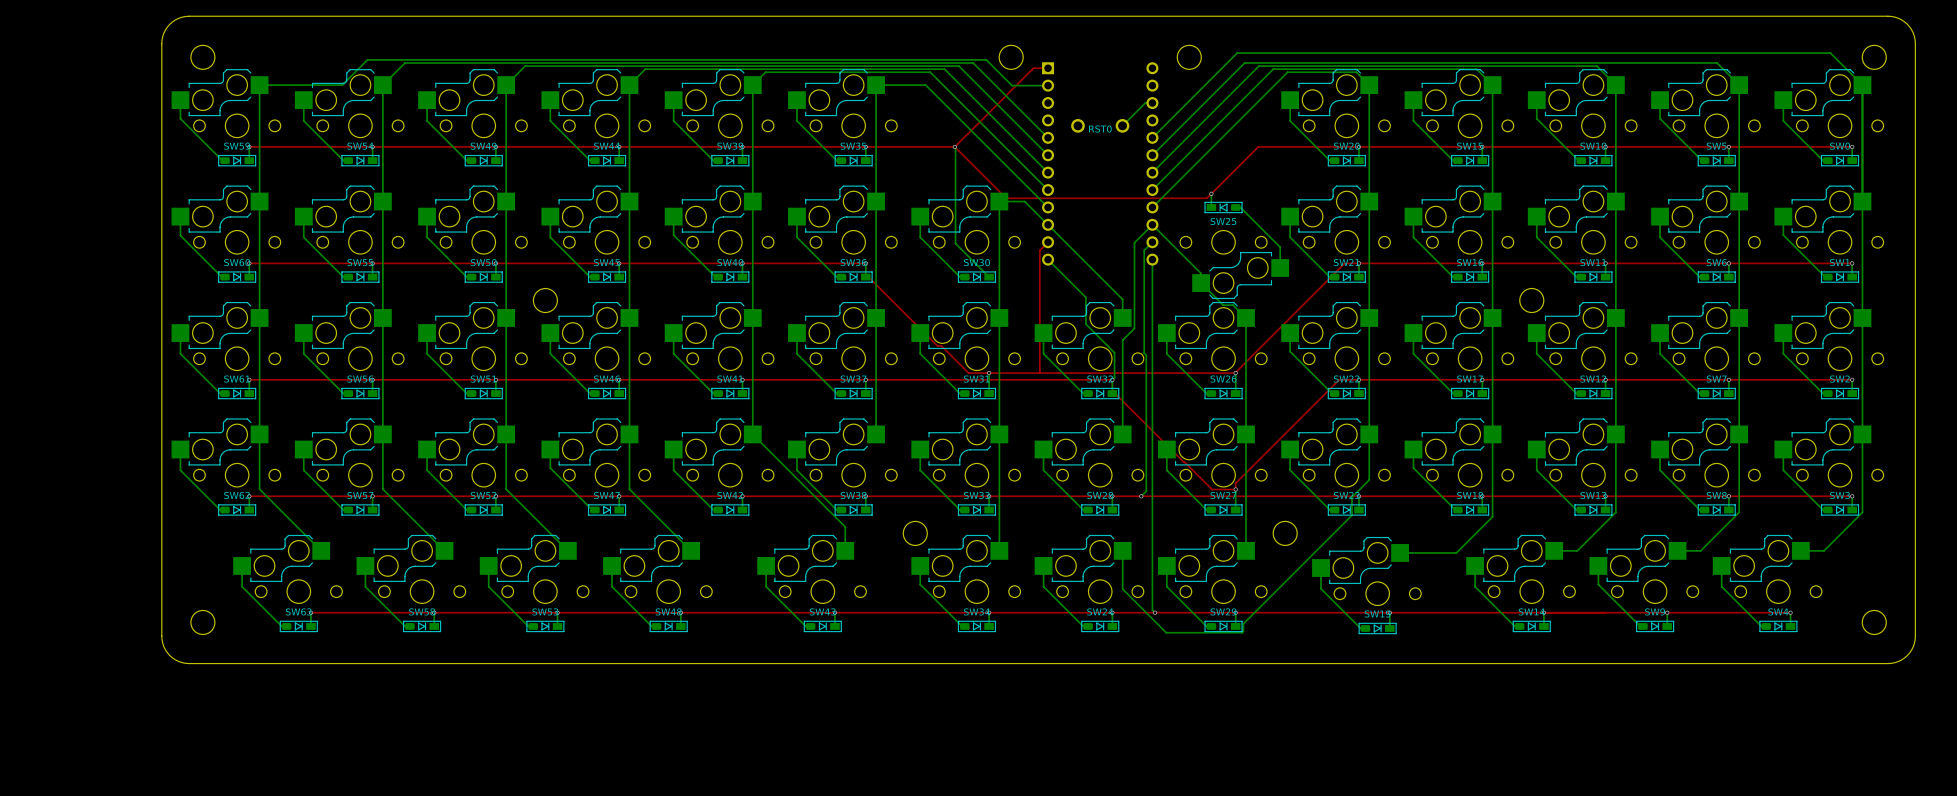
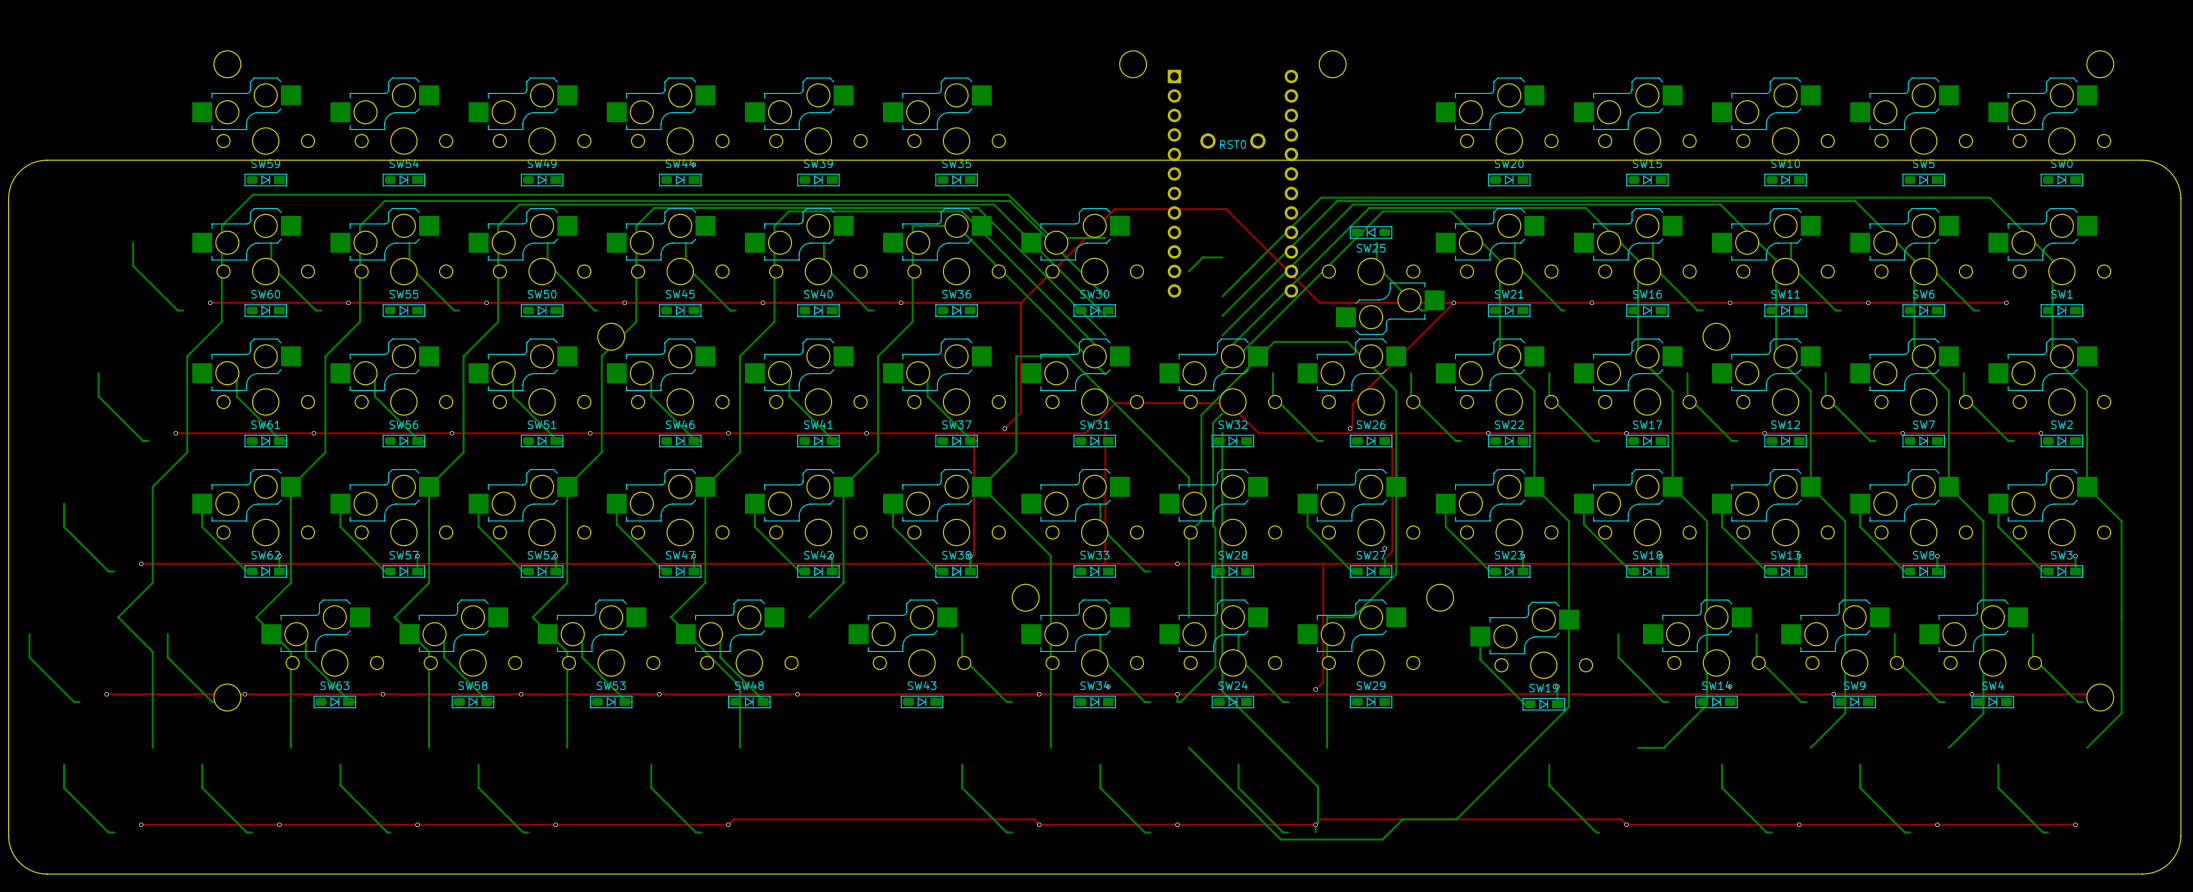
board edge: (1887, 16) (189, 16) (178, 18) (165, 29) (161, 43) (161, 636) (163, 646) (172, 657) (189, 663) (1887, 663) (1898, 661) (1909, 652) (1915, 636) (1915, 43) (1913, 33) (1907, 24) (1898, 18) (1887, 16) -> (2142, 160) (2155, 162) (2169, 171) (2178, 185) (2180, 198) (2180, 835) (2178, 848) (2172, 859) (2155, 871) (2142, 874) (46, 874) (34, 871) (23, 865) (10, 848) (8, 835) (8, 198) (10, 185) (16, 174) (34, 162) (46, 160) (2142, 160)
top track: (1048, 68) (1033, 68) (954, 146) -> none
bottom track: (1048, 85) (1012, 85) (986, 59) (367, 59) (342, 85) (259, 85) (259, 434) -> (1105, 296) (1009, 201) (384, 201) (359, 225) (359, 321) (325, 356) (325, 452) (290, 486)
bottom track: (180, 100) (180, 118) (222, 160) (224, 160) -> none
bottom track: (303, 100) (303, 120) (343, 160) (348, 160) -> (271, 242) (271, 265) (315, 310) (321, 310)
bottom track: (427, 100) (427, 120) (466, 160) (471, 160) -> (409, 242) (409, 265) (453, 310) (459, 310)
bottom track: (550, 100) (550, 120) (590, 160) (594, 160) -> none
bottom track: (673, 100) (673, 120) (713, 160) (718, 160) -> (685, 242) (685, 265) (730, 310) (735, 310)
bottom track: (796, 100) (796, 120) (836, 160) (841, 160) -> (823, 242) (823, 265) (868, 310) (873, 310)
bottom track: (1290, 100) (1290, 120) (1329, 160) (1334, 160) -> (1376, 242) (1376, 265) (1421, 310) (1426, 310)
bottom track: (1413, 100) (1413, 120) (1453, 160) (1457, 160) -> (1652, 242) (1652, 265) (1697, 310) (1702, 310)
bottom track: (1536, 100) (1536, 118) (1578, 160) (1581, 160) -> none
bottom track: (1660, 100) (1660, 118) (1701, 160) (1704, 160) -> none
bottom track: (1783, 100) (1783, 120) (1823, 160) (1827, 160) -> (1929, 242) (1929, 265) (1973, 310) (1979, 310)
bottom track: (1152, 103) (1145, 103) (1122, 125) -> none
bottom track: (1048, 137) (973, 62) (404, 62) (382, 85) (382, 434) -> (1105, 315) (993, 204) (519, 204) (498, 225) (498, 321) (463, 356) (463, 452) (429, 486)
bottom track: (1152, 137) (1237, 53) (1830, 53) (1862, 85) (1862, 512) (1823, 550) (1800, 550) -> none
bottom track: (249, 146) (249, 160) -> none
via: (249, 146) -> none
bottom track: (372, 146) (372, 160) -> none
via: (372, 146) -> none
bottom track: (495, 146) (495, 160) -> none
via: (495, 146) -> none
bottom track: (619, 146) (619, 160) -> none
bottom track: (742, 146) (742, 160) -> none
via: (742, 146) -> none
bottom track: (865, 146) (865, 160) -> none
via: (865, 146) -> none
bottom track: (954, 146) (955, 243) (989, 277) -> none
top track: (954, 146) (249, 146) -> none
via: (954, 146) -> none
bottom track: (1359, 146) (1359, 160) -> none
via: (1359, 146) -> none
bottom track: (1482, 146) (1482, 160) -> none
via: (1482, 146) -> none
bottom track: (1605, 146) (1605, 160) -> none
via: (1605, 146) -> none
bottom track: (1728, 146) (1728, 160) -> none
via: (1728, 146) -> none
bottom track: (1852, 146) (1852, 160) -> none
top track: (1852, 146) (1258, 146) (1206, 198) (1006, 198) (954, 146) -> none
via: (1852, 146) -> none
bottom track: (1048, 155) (958, 66) (525, 66) (506, 85) (506, 434) -> (1105, 335) (977, 207) (654, 207) (636, 225) (636, 321) (601, 356) (601, 452) (567, 486)
bottom track: (1152, 155) (1244, 62) (1717, 62) (1739, 85) (1739, 512) (1700, 550) (1677, 550) -> none
bottom track: (1048, 172) (944, 69) (645, 69) (629, 85) (629, 434) -> (1105, 354) (961, 211) (788, 211) (774, 225) (774, 321) (739, 356) (739, 452) (705, 486)
bottom track: (1152, 172) (1258, 66) (1596, 66) (1615, 85) (1615, 512) (1577, 550) (1554, 550) -> none
bottom track: (1048, 190) (930, 72) (765, 72) (752, 85) (752, 434) (845, 526) (845, 550) -> none
bottom track: (1152, 190) (1273, 69) (1476, 69) (1492, 85) (1492, 348) -> (1222, 354) (1369, 207) (1585, 207) (1637, 260) (1637, 356) (1672, 390)
bottom track: (1211, 193) (1211, 207) -> none
via: (1211, 193) -> none
bottom track: (1048, 207) (925, 85) (876, 85) (876, 434) -> none
bottom track: (1152, 207) (1287, 72) (1356, 72) (1369, 85) (1369, 348) -> (1222, 374) (1222, 372) (1382, 211) (1450, 211) (1499, 260) (1499, 356) (1534, 390)
bottom track: (1235, 207) (1240, 207) (1280, 247) (1280, 267) -> none
bottom track: none -> (1105, 237) (1051, 237) (1008, 194) (252, 194) (221, 225) (221, 321) (187, 356) (187, 452) (152, 486) (152, 582) (118, 617) (152, 651) (152, 747)
bottom track: none -> (133, 242) (133, 265) (177, 310) (183, 310)
bottom track: (180, 216) (180, 235) (221, 277) (224, 277) -> none
bottom track: (303, 216) (303, 237) (343, 277) (348, 277) -> none
bottom track: (427, 216) (427, 237) (466, 277) (471, 277) -> none
bottom track: none -> (547, 242) (547, 263) (594, 310) (597, 310)
bottom track: (550, 216) (550, 237) (590, 277) (594, 277) -> none
bottom track: (673, 216) (673, 235) (715, 277) (718, 277) -> none
bottom track: (796, 216) (796, 237) (836, 277) (841, 277) -> none
bottom track: (920, 216) (920, 237) (959, 277) (964, 277) -> none
bottom track: (1290, 216) (1290, 237) (1329, 277) (1334, 277) -> (1549, 373) (1549, 396) (1593, 440) (1599, 440)
bottom track: (1413, 216) (1413, 237) (1453, 277) (1457, 277) -> none
bottom track: (1536, 216) (1536, 237) (1576, 277) (1581, 277) -> none
bottom track: (1660, 216) (1660, 237) (1699, 277) (1704, 277) -> (1791, 242) (1791, 265) (1835, 310) (1841, 310)
bottom track: (1783, 216) (1783, 235) (1825, 277) (1827, 277) -> none
bottom track: none -> (1222, 257) (1202, 257) (1188, 271)
top track: (1048, 242) (1039, 250) (1038, 373) -> none
bottom track: (1152, 242) (1144, 250) (1146, 491) (1141, 496) -> none
bottom track: (1048, 259) (1085, 297) (1085, 324) (1114, 352) (1112, 393) -> none
bottom track: (1152, 259) (1152, 610) (1155, 612) -> none
bottom track: (249, 263) (249, 277) -> none
top track: (249, 263) (865, 263) (865, 274) (937, 345) (941, 345) (968, 373) (989, 373) -> none
via: (249, 263) -> none
bottom track: (372, 263) (372, 277) -> none
via: (372, 263) -> none
bottom track: (495, 263) (495, 277) -> none
via: (495, 263) -> none
bottom track: (619, 263) (619, 277) -> none
via: (619, 263) -> none
bottom track: (742, 263) (742, 277) -> none
via: (742, 263) -> none
bottom track: (865, 263) (865, 277) -> none
via: (865, 263) -> none
bottom track: (1359, 263) (1359, 277) -> none
via: (1359, 263) -> none
bottom track: (1482, 263) (1482, 277) -> none
via: (1482, 263) -> none
bottom track: (1605, 263) (1605, 277) -> none
via: (1605, 263) -> none
bottom track: (1728, 263) (1728, 277) -> none
via: (1728, 263) -> none
bottom track: (1852, 263) (1852, 277) -> none
top track: (1852, 263) (1344, 263) (1235, 372) -> none
via: (1852, 263) -> none
bottom track: none -> (1222, 296) (1321, 197) (1989, 197) (2052, 260) (2052, 356) (2087, 390) (2087, 486) (2121, 521) (2121, 713) (2087, 747)
via: none -> (210, 302)
via: none -> (348, 302)
via: none -> (486, 302)
via: none -> (624, 302)
via: none -> (762, 302)
via: none -> (901, 302)
top track: none -> (1020, 302) (210, 302)
top track: none -> (1020, 302) (1020, 412) (1004, 428)
top track: none -> (1453, 302) (1352, 404) (1352, 426) (1350, 428)
via: none -> (1453, 302)
via: none -> (1591, 302)
via: none -> (1730, 302)
via: none -> (1868, 302)
top track: none -> (2006, 302) (1319, 302) (1226, 209) (1114, 209) (1020, 302)
via: none -> (2006, 302)
bottom track: none -> (1222, 315) (1337, 201) (1855, 201) (1914, 260) (1914, 356) (1948, 390) (1948, 486) (1983, 521) (1983, 713) (1948, 747)
bottom track: none -> (1222, 335) (1353, 204) (1720, 204) (1776, 260) (1776, 356) (1810, 390) (1810, 486) (1845, 521) (1845, 713) (1810, 747)
bottom track: (1122, 317) (1122, 299) (1024, 201) (999, 201) (999, 550) -> none
bottom track: (180, 333) (180, 353) (220, 393) (224, 393) -> (98, 373) (98, 396) (143, 440) (148, 440)
bottom track: (303, 333) (303, 353) (343, 393) (348, 393) -> (236, 373) (236, 396) (281, 440) (286, 440)
bottom track: (427, 333) (427, 353) (466, 393) (471, 393) -> (374, 373) (374, 396) (419, 440) (424, 440)
bottom track: (550, 333) (550, 353) (590, 393) (594, 393) -> (513, 373) (513, 396) (557, 440) (562, 440)
bottom track: (673, 333) (673, 353) (713, 393) (718, 393) -> (651, 373) (651, 396) (695, 440) (701, 440)
bottom track: (796, 333) (796, 353) (836, 393) (841, 393) -> (789, 373) (789, 396) (833, 440) (839, 440)
bottom track: (920, 333) (920, 353) (959, 393) (964, 393) -> (927, 373) (927, 396) (972, 440) (977, 440)
bottom track: (1043, 333) (1043, 353) (1083, 393) (1088, 393) -> (1100, 503) (1100, 526) (1144, 571) (1150, 571)
bottom track: none -> (1273, 373) (1273, 396) (1317, 440) (1322, 440)
bottom track: (1166, 333) (1166, 353) (1206, 393) (1211, 393) -> (1411, 373) (1411, 396) (1455, 440) (1461, 440)
bottom track: (1290, 333) (1290, 351) (1332, 393) (1334, 393) -> (1514, 242) (1514, 263) (1561, 310) (1564, 310)
bottom track: (1413, 333) (1413, 353) (1453, 393) (1457, 393) -> (1687, 373) (1687, 396) (1732, 440) (1737, 440)
bottom track: (1536, 333) (1536, 353) (1576, 393) (1581, 393) -> (1825, 373) (1825, 396) (1870, 440) (1875, 440)
bottom track: (1660, 333) (1660, 353) (1699, 393) (1704, 393) -> (1963, 373) (1963, 396) (2008, 440) (2013, 440)
bottom track: (1783, 333) (1783, 353) (1823, 393) (1827, 393) -> none
bottom track: none -> (1105, 374) (956, 225) (912, 225) (912, 321) (878, 356) (878, 452) (843, 486) (843, 582) (809, 617)
bottom track: (1245, 348) (1245, 317) (1233, 305) (1223, 305) (1201, 283) (1201, 273) (1152, 224) (1134, 242) (1134, 328) (1122, 340) (1122, 434) -> (1396, 390) (1347, 341) (1274, 341) (1201, 414) (1201, 520) (1188, 533) (1188, 617)
bottom track: none -> (1222, 413) (1213, 422) (1215, 667) (1180, 701) (1177, 701) (1177, 694)
bottom track: (989, 372) (989, 393) -> none
via: (989, 372) -> none
bottom track: (1235, 372) (1235, 393) -> none
via position: (1235, 372) -> (1350, 428)
top track: (1235, 373) (989, 373) -> none
bottom track: (249, 379) (249, 393) -> none
top track: (249, 379) (1112, 379) (1112, 390) (1212, 489) (1235, 489) -> none
via position: (249, 379) -> (313, 433)
bottom track: (372, 379) (372, 393) -> none
via position: (372, 379) -> (452, 433)
bottom track: (495, 379) (495, 393) -> none
via position: (495, 379) -> (590, 433)
bottom track: (619, 379) (619, 393) -> none
via position: (619, 379) -> (728, 433)
bottom track: (742, 379) (742, 393) -> none
via position: (742, 379) -> (866, 433)
bottom track: (865, 379) (865, 393) -> none
via position: (865, 379) -> (1004, 428)
via: (1112, 379) -> none
bottom track: (1359, 379) (1359, 393) -> none
via position: (1359, 379) -> (1488, 433)
bottom track: (1482, 379) (1482, 393) -> none
via position: (1482, 379) -> (1626, 433)
bottom track: (1605, 379) (1605, 393) -> none
via position: (1605, 379) -> (1764, 433)
bottom track: (1728, 379) (1728, 393) -> none
via position: (1728, 379) -> (1902, 433)
bottom track: (1852, 379) (1852, 393) -> none
top track: (1852, 379) (1339, 379) (1235, 483) (1235, 489) -> none
via position: (1852, 379) -> (2040, 433)
via: none -> (175, 433)
top track: none -> (974, 433) (974, 555) (970, 559)
top track: none -> (1105, 432) (1104, 563)
bottom track: none -> (1222, 432) (1222, 691) (1318, 786) (1318, 822) (1315, 824) (1315, 832)
top track: none -> (1392, 433) (1392, 551) (1384, 559)
top track: none -> (2040, 433) (1258, 433) (1228, 403) (1115, 403) (1085, 433) (175, 433)
bottom track: none -> (1188, 486) (1188, 477) (1067, 356) (1016, 356) (1016, 452) (981, 486) (1050, 555) (1050, 747)
bottom track: (1369, 434) (1369, 479) (1351, 497) (1351, 515) (1243, 623) (1242, 632) (1166, 632) (1122, 589) (1122, 550) -> (1534, 486) (1568, 521) (1568, 706) (1456, 819) (1402, 819) (1382, 839) (1280, 839) (1188, 747)
bottom track: (1492, 434) (1492, 516) (1456, 552) (1400, 552) -> (1672, 486) (1707, 521) (1707, 704) (1663, 747) (1637, 747)
bottom track: none -> (64, 503) (64, 526) (108, 571) (113, 571)
bottom track: (920, 449) (920, 470) (959, 509) (964, 509) -> (962, 634) (962, 657) (1006, 701) (1012, 701)
bottom track: (1043, 449) (1043, 470) (1083, 509) (1088, 509) -> (1100, 634) (1100, 657) (1144, 701) (1150, 701)
bottom track: (259, 489) (321, 550) -> (290, 548) (290, 582) (256, 617) (290, 651) (290, 747)
bottom track: (382, 489) (444, 550) -> (429, 548) (429, 582) (394, 617) (429, 651) (429, 747)
bottom track: (506, 489) (567, 550) -> (567, 548) (567, 582) (532, 617) (567, 651) (567, 747)
bottom track: (629, 489) (691, 550) -> (705, 548) (705, 582) (670, 617) (739, 686) (739, 747)
bottom track: (1235, 489) (1235, 498) -> none
bottom track: (989, 496) (989, 509) -> none
via: (989, 496) -> none
bottom track: (1112, 496) (1112, 509) -> none
via: (1112, 496) -> none
via: (1141, 496) -> none
top track: (1852, 496) (249, 496) -> none
via: none -> (141, 563)
via: none -> (1177, 563)
top track: none -> (1323, 563) (1323, 681) (1315, 689)
top track: none -> (2075, 563) (141, 563)
bottom track: (1245, 512) (1245, 550) -> (1396, 574) (1353, 617) (1327, 617) (1327, 747)
bottom track: none -> (29, 634) (29, 657) (74, 701) (79, 701)
bottom track: none -> (167, 634) (167, 657) (212, 701) (217, 701)
bottom track: (242, 565) (242, 586) (281, 626) (286, 626) -> (202, 764) (202, 787) (246, 832) (252, 832)
bottom track: (365, 565) (365, 586) (405, 626) (409, 626) -> (305, 634) (305, 657) (350, 701) (355, 701)
bottom track: none -> (444, 634) (444, 657) (488, 701) (493, 701)
bottom track: (488, 565) (488, 586) (528, 626) (533, 626) -> (478, 764) (478, 787) (523, 832) (528, 832)
bottom track: (612, 565) (612, 586) (651, 626) (656, 626) -> (582, 634) (582, 657) (626, 701) (632, 701)
bottom track: none -> (720, 634) (720, 657) (764, 701) (770, 701)
bottom track: (766, 565) (766, 586) (805, 626) (810, 626) -> (962, 764) (962, 787) (1006, 832) (1012, 832)
bottom track: (920, 565) (920, 584) (962, 626) (964, 626) -> none
bottom track: (1043, 565) (1043, 586) (1083, 626) (1088, 626) -> (1100, 764) (1100, 787) (1144, 832) (1150, 832)
bottom track: none -> (1238, 634) (1238, 657) (1282, 701) (1288, 701)
bottom track: (1166, 565) (1166, 586) (1206, 626) (1211, 626) -> (1238, 764) (1238, 787) (1282, 832) (1288, 832)
bottom track: none -> (1618, 634) (1618, 657) (1662, 701) (1668, 701)
bottom track: (1475, 565) (1475, 586) (1514, 626) (1519, 626) -> (1722, 764) (1722, 787) (1766, 832) (1771, 832)
bottom track: none -> (1756, 634) (1756, 657) (1801, 701) (1806, 701)
bottom track: (1598, 565) (1598, 584) (1640, 626) (1642, 626) -> none
bottom track: none -> (1894, 634) (1894, 657) (1939, 701) (1944, 701)
bottom track: (1721, 565) (1721, 586) (1761, 626) (1766, 626) -> (1860, 764) (1860, 787) (1904, 832) (1910, 832)
bottom track: none -> (2032, 634) (2032, 657) (2077, 701) (2082, 701)
bottom track: (310, 612) (310, 626) -> none
via position: (310, 612) -> (382, 694)
bottom track: (434, 612) (434, 626) -> none
via position: (434, 612) -> (521, 694)
bottom track: (557, 612) (557, 626) -> none
via position: (557, 612) -> (659, 694)
bottom track: (680, 612) (680, 626) -> none
via position: (680, 612) -> (797, 694)
bottom track: (834, 612) (834, 626) -> none
via: (834, 612) -> none
bottom track: (989, 612) (989, 626) -> none
bottom track: (1112, 612) (1112, 626) -> none
via: (1112, 612) -> none
via position: (1155, 612) -> (1315, 689)
bottom track: (1235, 612) (1235, 626) -> none
via: (1235, 612) -> none
bottom track: (1543, 612) (1543, 626) -> none
bottom track: (1667, 612) (1667, 626) -> none
via position: (1667, 612) -> (1833, 694)
bottom track: (1790, 612) (1790, 626) -> none
top track: (1790, 612) (310, 612) -> none
via position: (1790, 612) -> (1971, 694)
via: none -> (106, 694)
via: none -> (244, 694)
via: none -> (1039, 694)
via: none -> (1177, 694)
top track: none -> (2110, 694) (106, 694)
bottom track: none -> (64, 764) (64, 787) (108, 832) (113, 832)
bottom track: none -> (340, 764) (340, 785) (387, 832) (390, 832)
bottom track: none -> (651, 764) (651, 787) (695, 832) (701, 832)
bottom track: none -> (1549, 764) (1549, 785) (1596, 832) (1599, 832)
bottom track: none -> (1998, 764) (1998, 787) (2042, 832) (2048, 832)
via: none -> (141, 824)
via: none -> (279, 824)
via: none -> (417, 824)
via: none -> (555, 824)
via: none -> (728, 824)
via: none -> (1039, 824)
via: none -> (1177, 824)
via: none -> (1315, 824)
via: none -> (1626, 824)
via: none -> (1799, 824)
via: none -> (1937, 824)
top track: none -> (2075, 824) (1626, 824) (1621, 819) (1321, 819) (1315, 824) (1039, 824) (1033, 819) (733, 819) (728, 824) (141, 824)
via: none -> (2075, 824)

